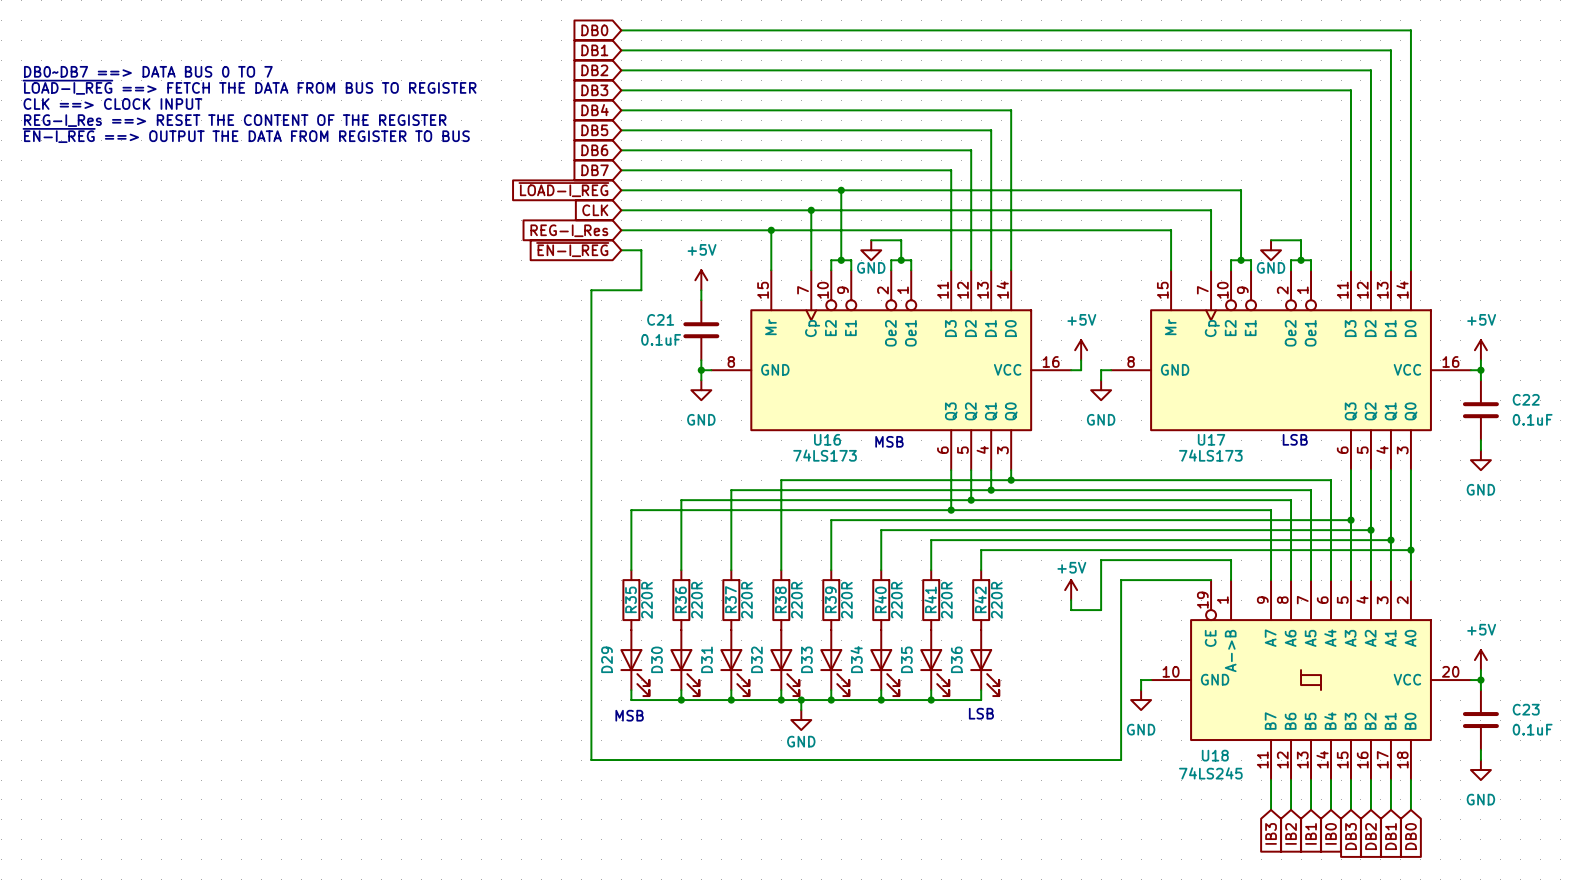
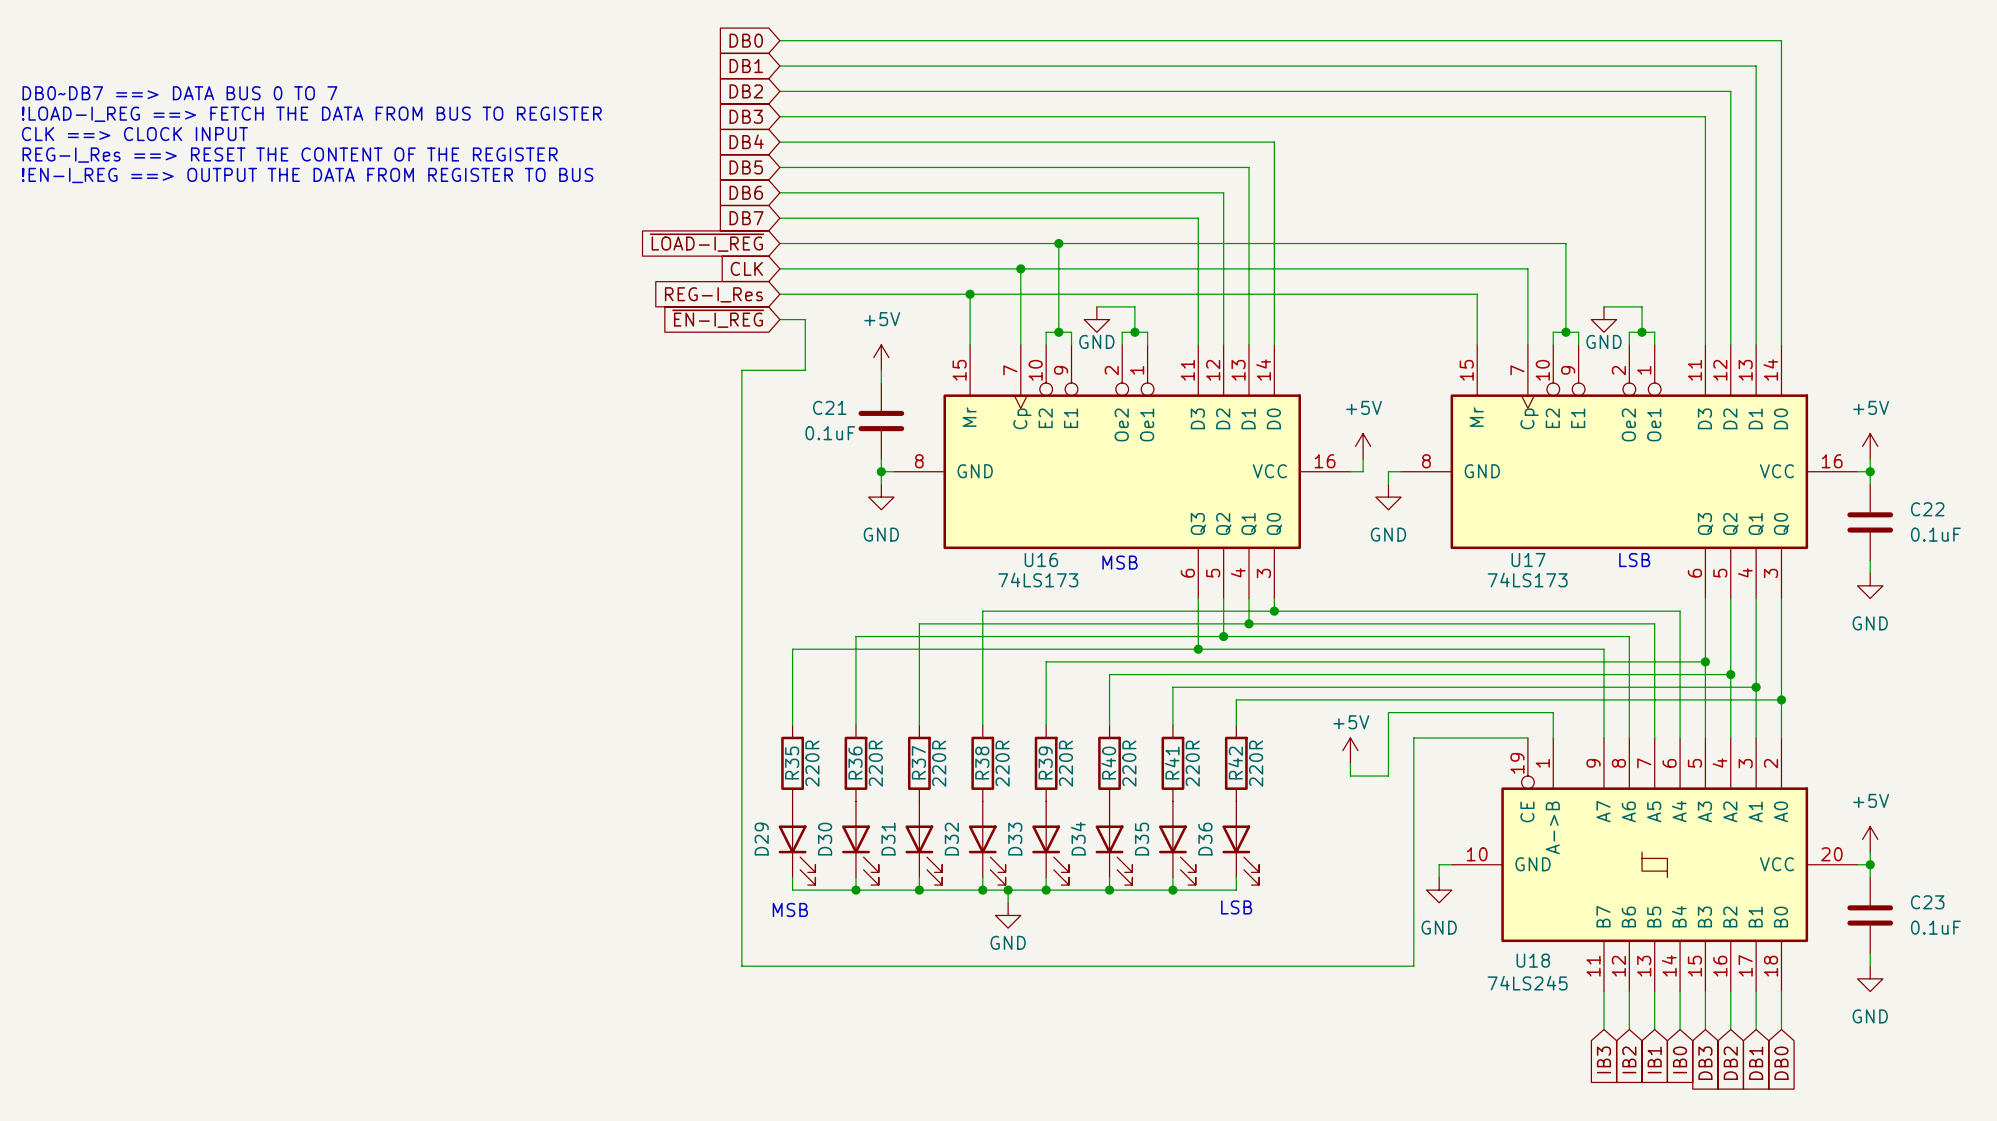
text: ~{LOAD-I_REG} ==> FETCH THE DATA FROM BUS TO REGISTER (249, 87) -> !LOAD-I_REG ==> FETCH THE DATA FROM BUS TO REGISTER (311, 114)
text: ~{EN-I_REG} ==> OUTPUT THE DATA FROM REGISTER TO BUS (246, 135) -> !EN-I_REG ==> OUTPUT THE DATA FROM REGISTER TO BUS (307, 175)

